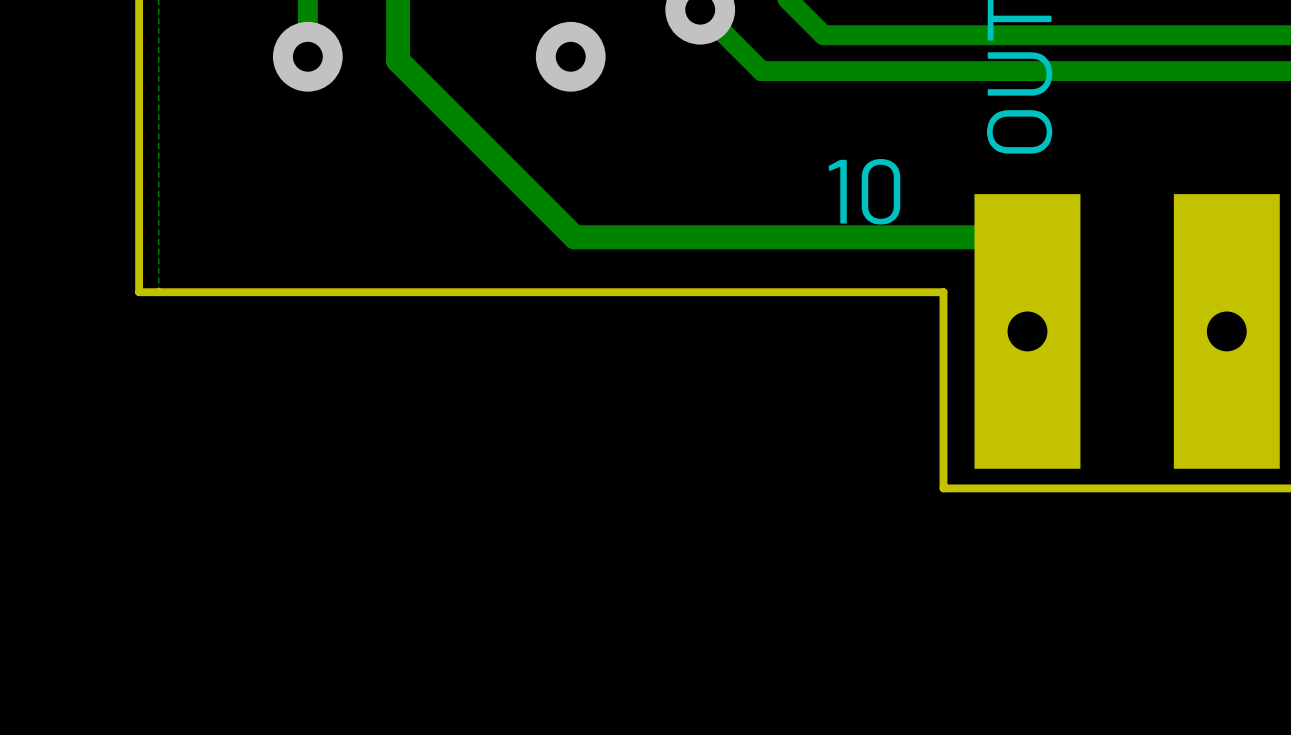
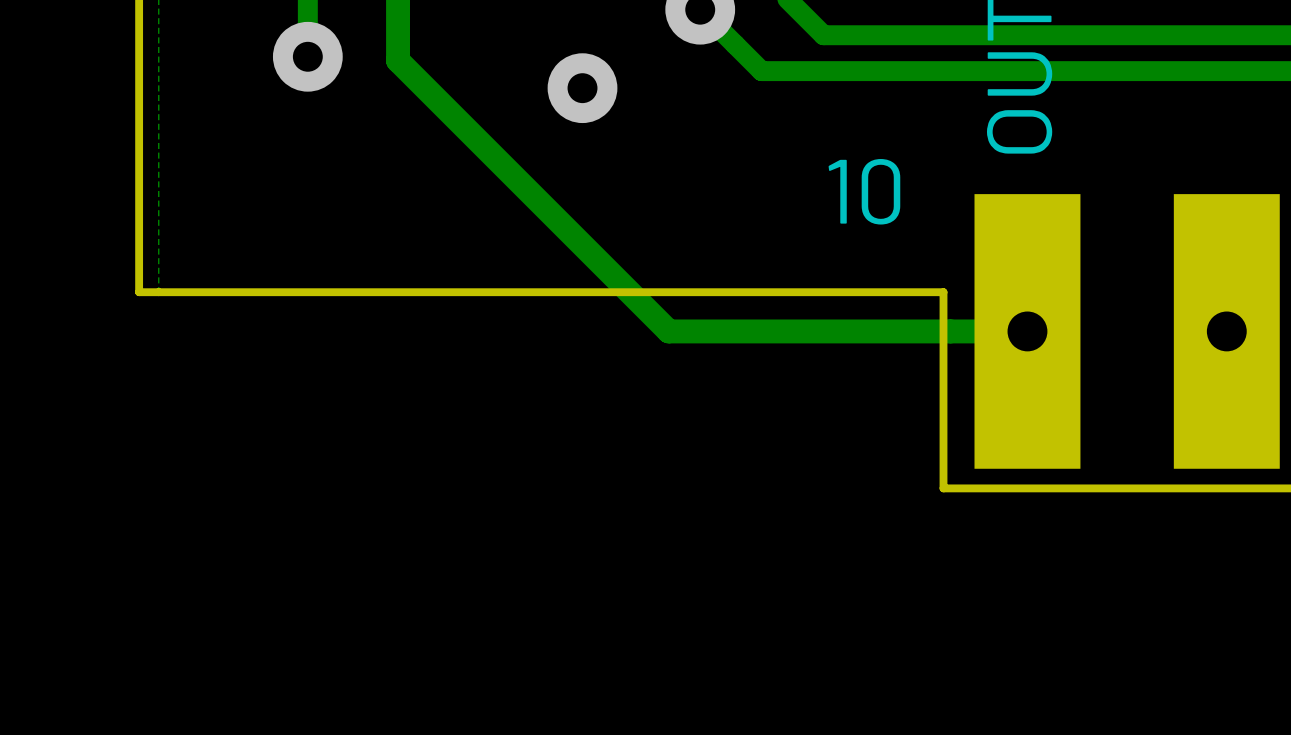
via position: (570, 56) -> (582, 88)
track: (574, 237) (998, 237) (1027, 266) (1027, 331) -> (574, 237) (668, 331) (1027, 331)

